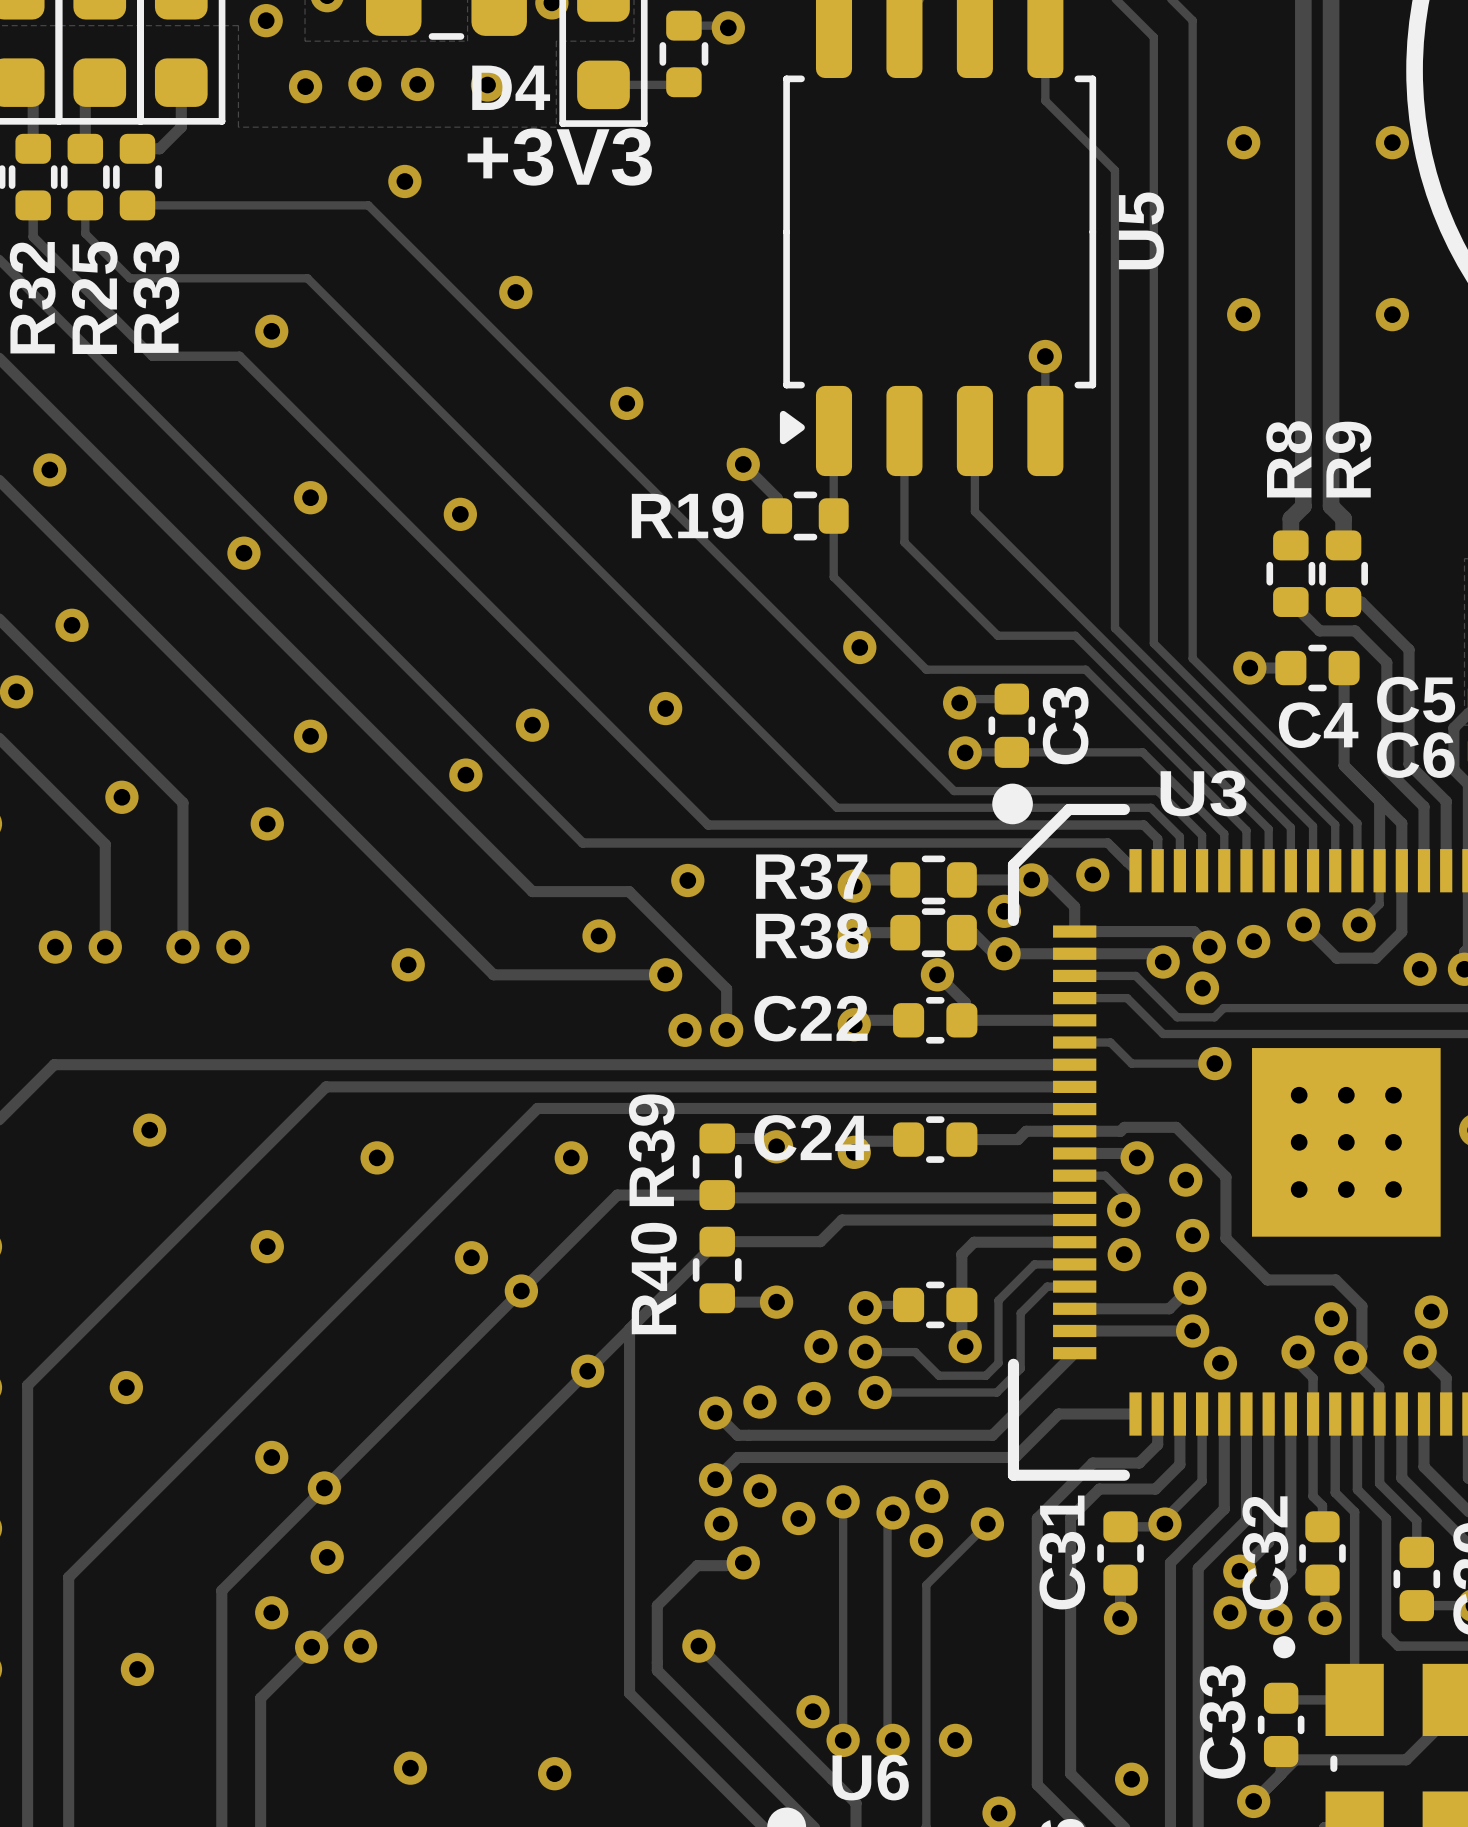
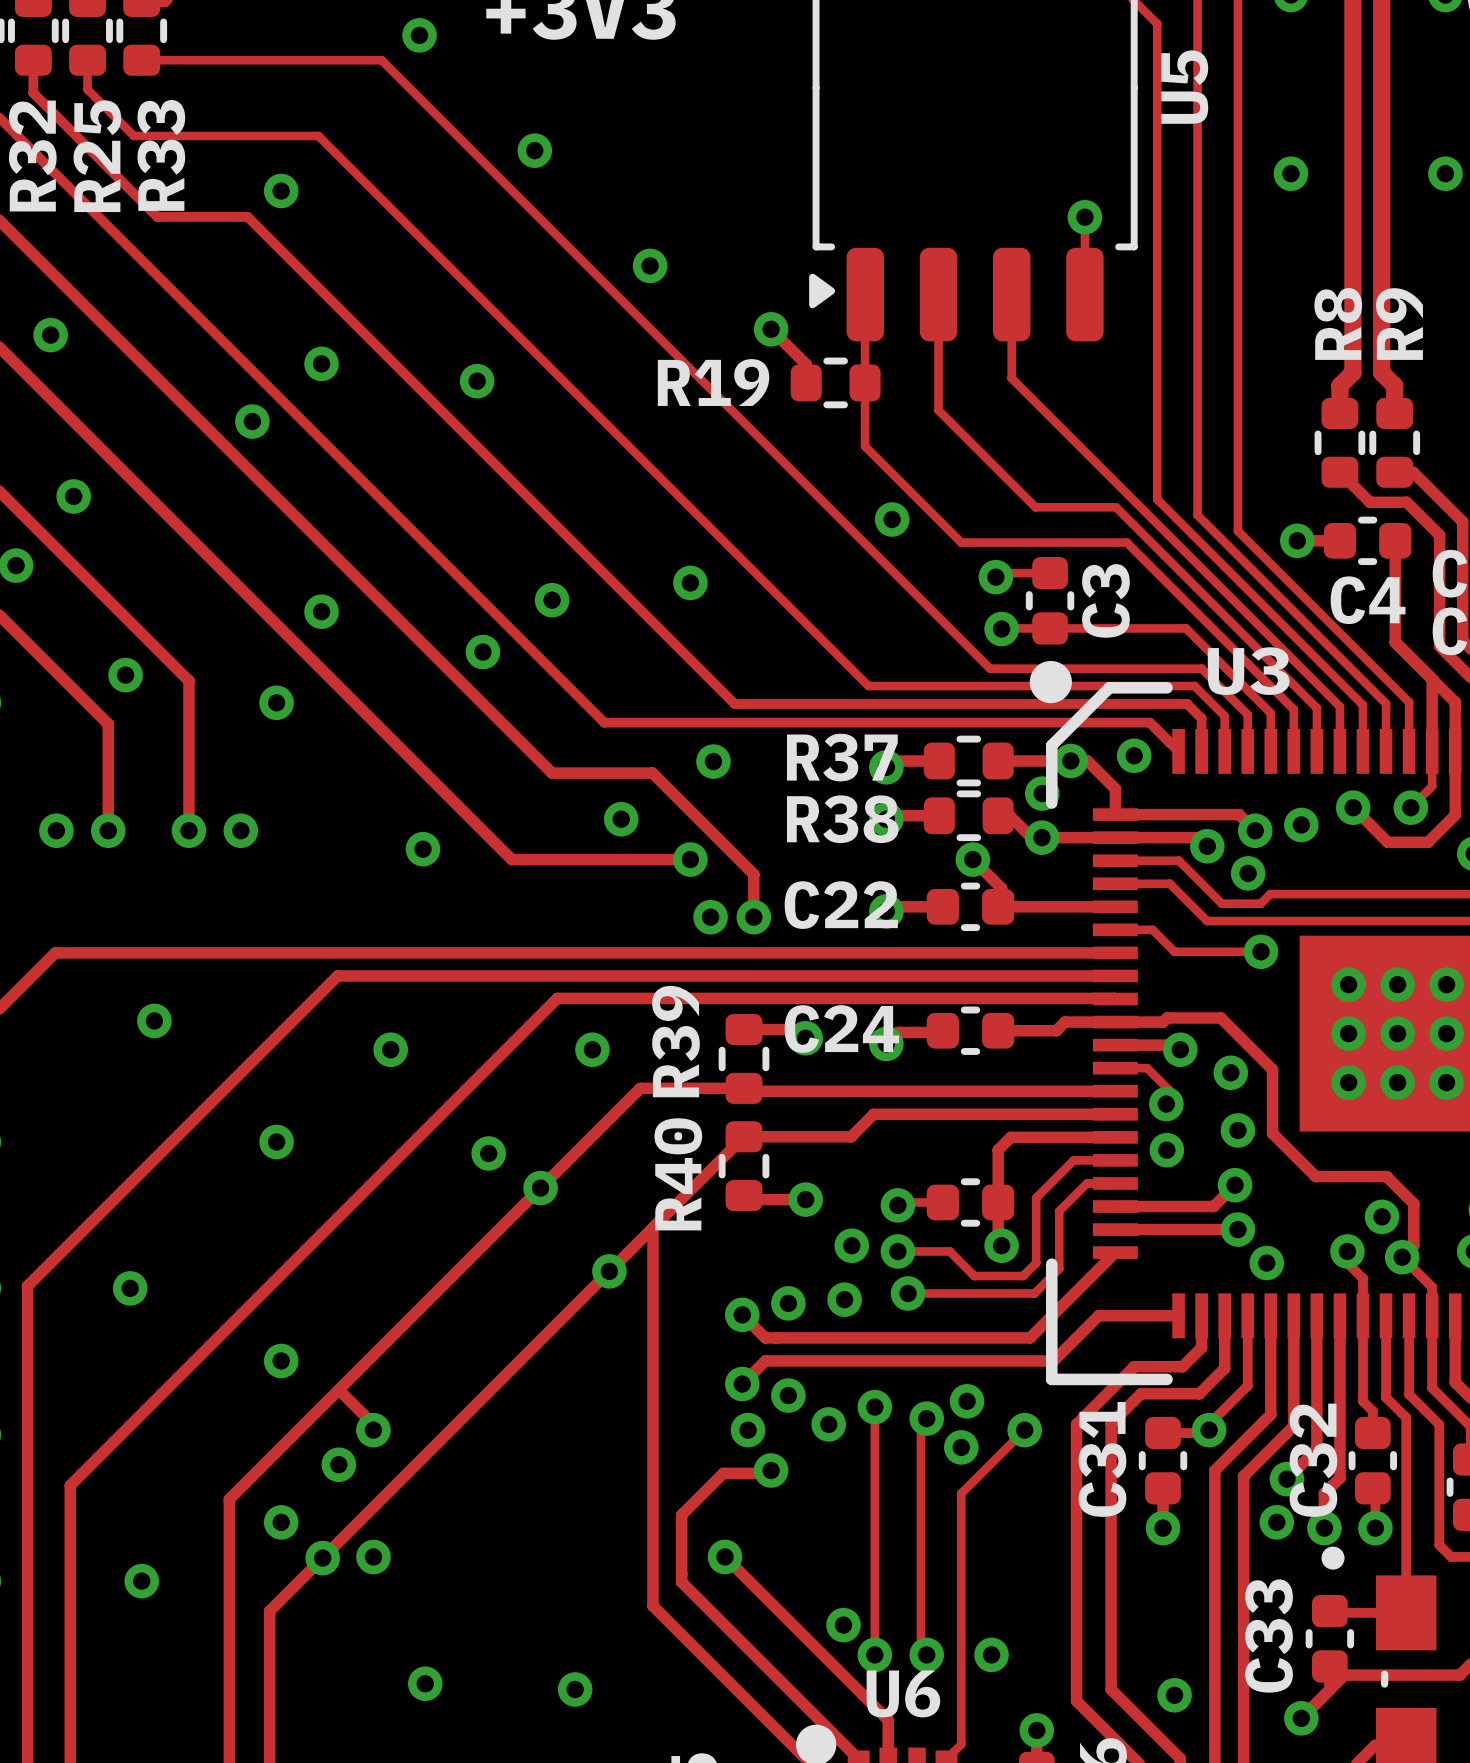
track: none -> (338, 1389) (373, 1424) (373, 1430)
via position: (324, 1487) -> (373, 1430)

